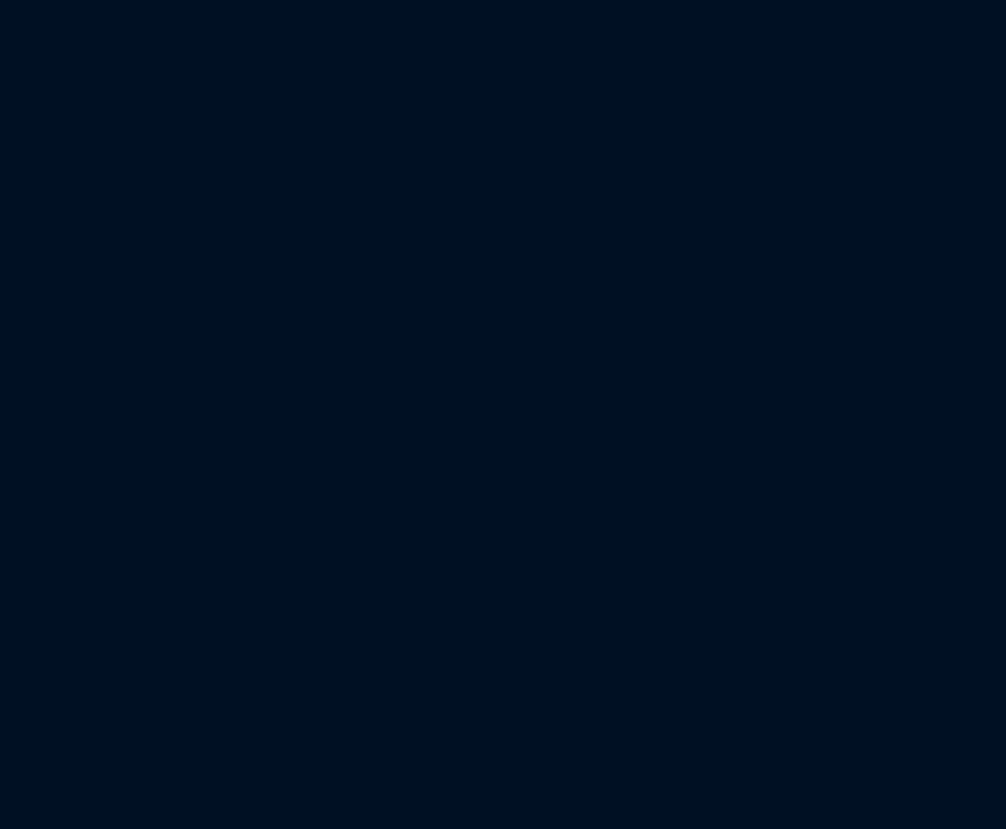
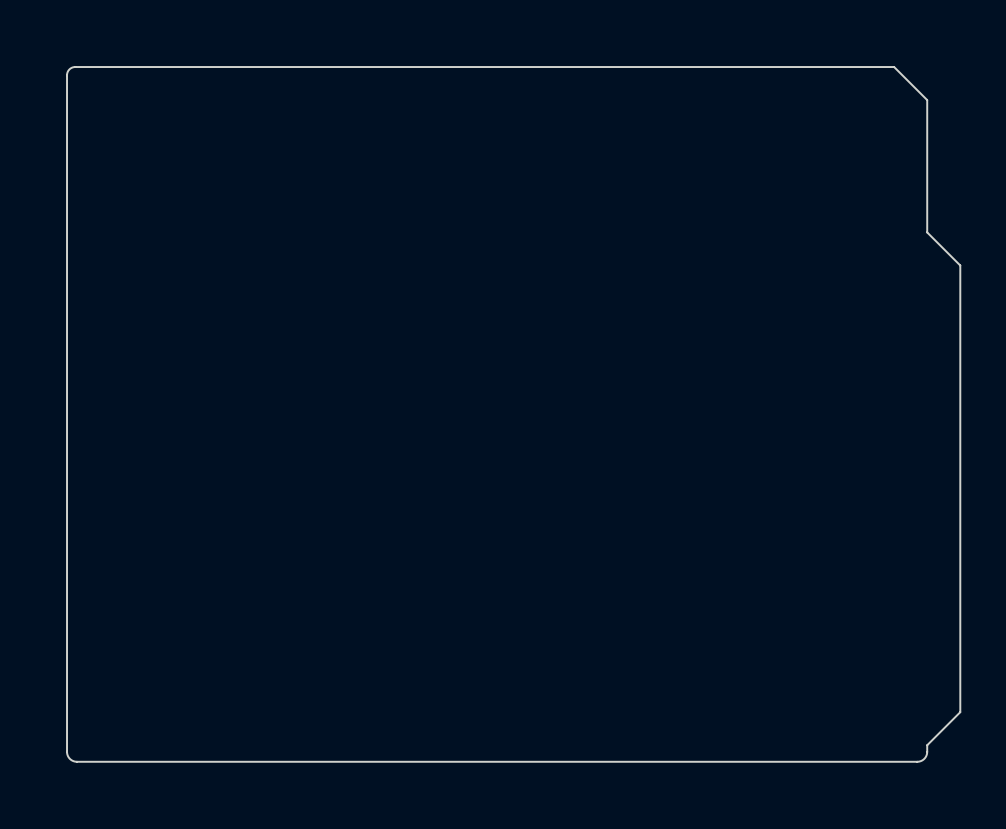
board edge: none -> (75, 67) (894, 67) (927, 100) (927, 232) (960, 265) (960, 712) (927, 745) (925, 757) (917, 761) (76, 761) (70, 759) (67, 751) (67, 75) (69, 69) (75, 67)

